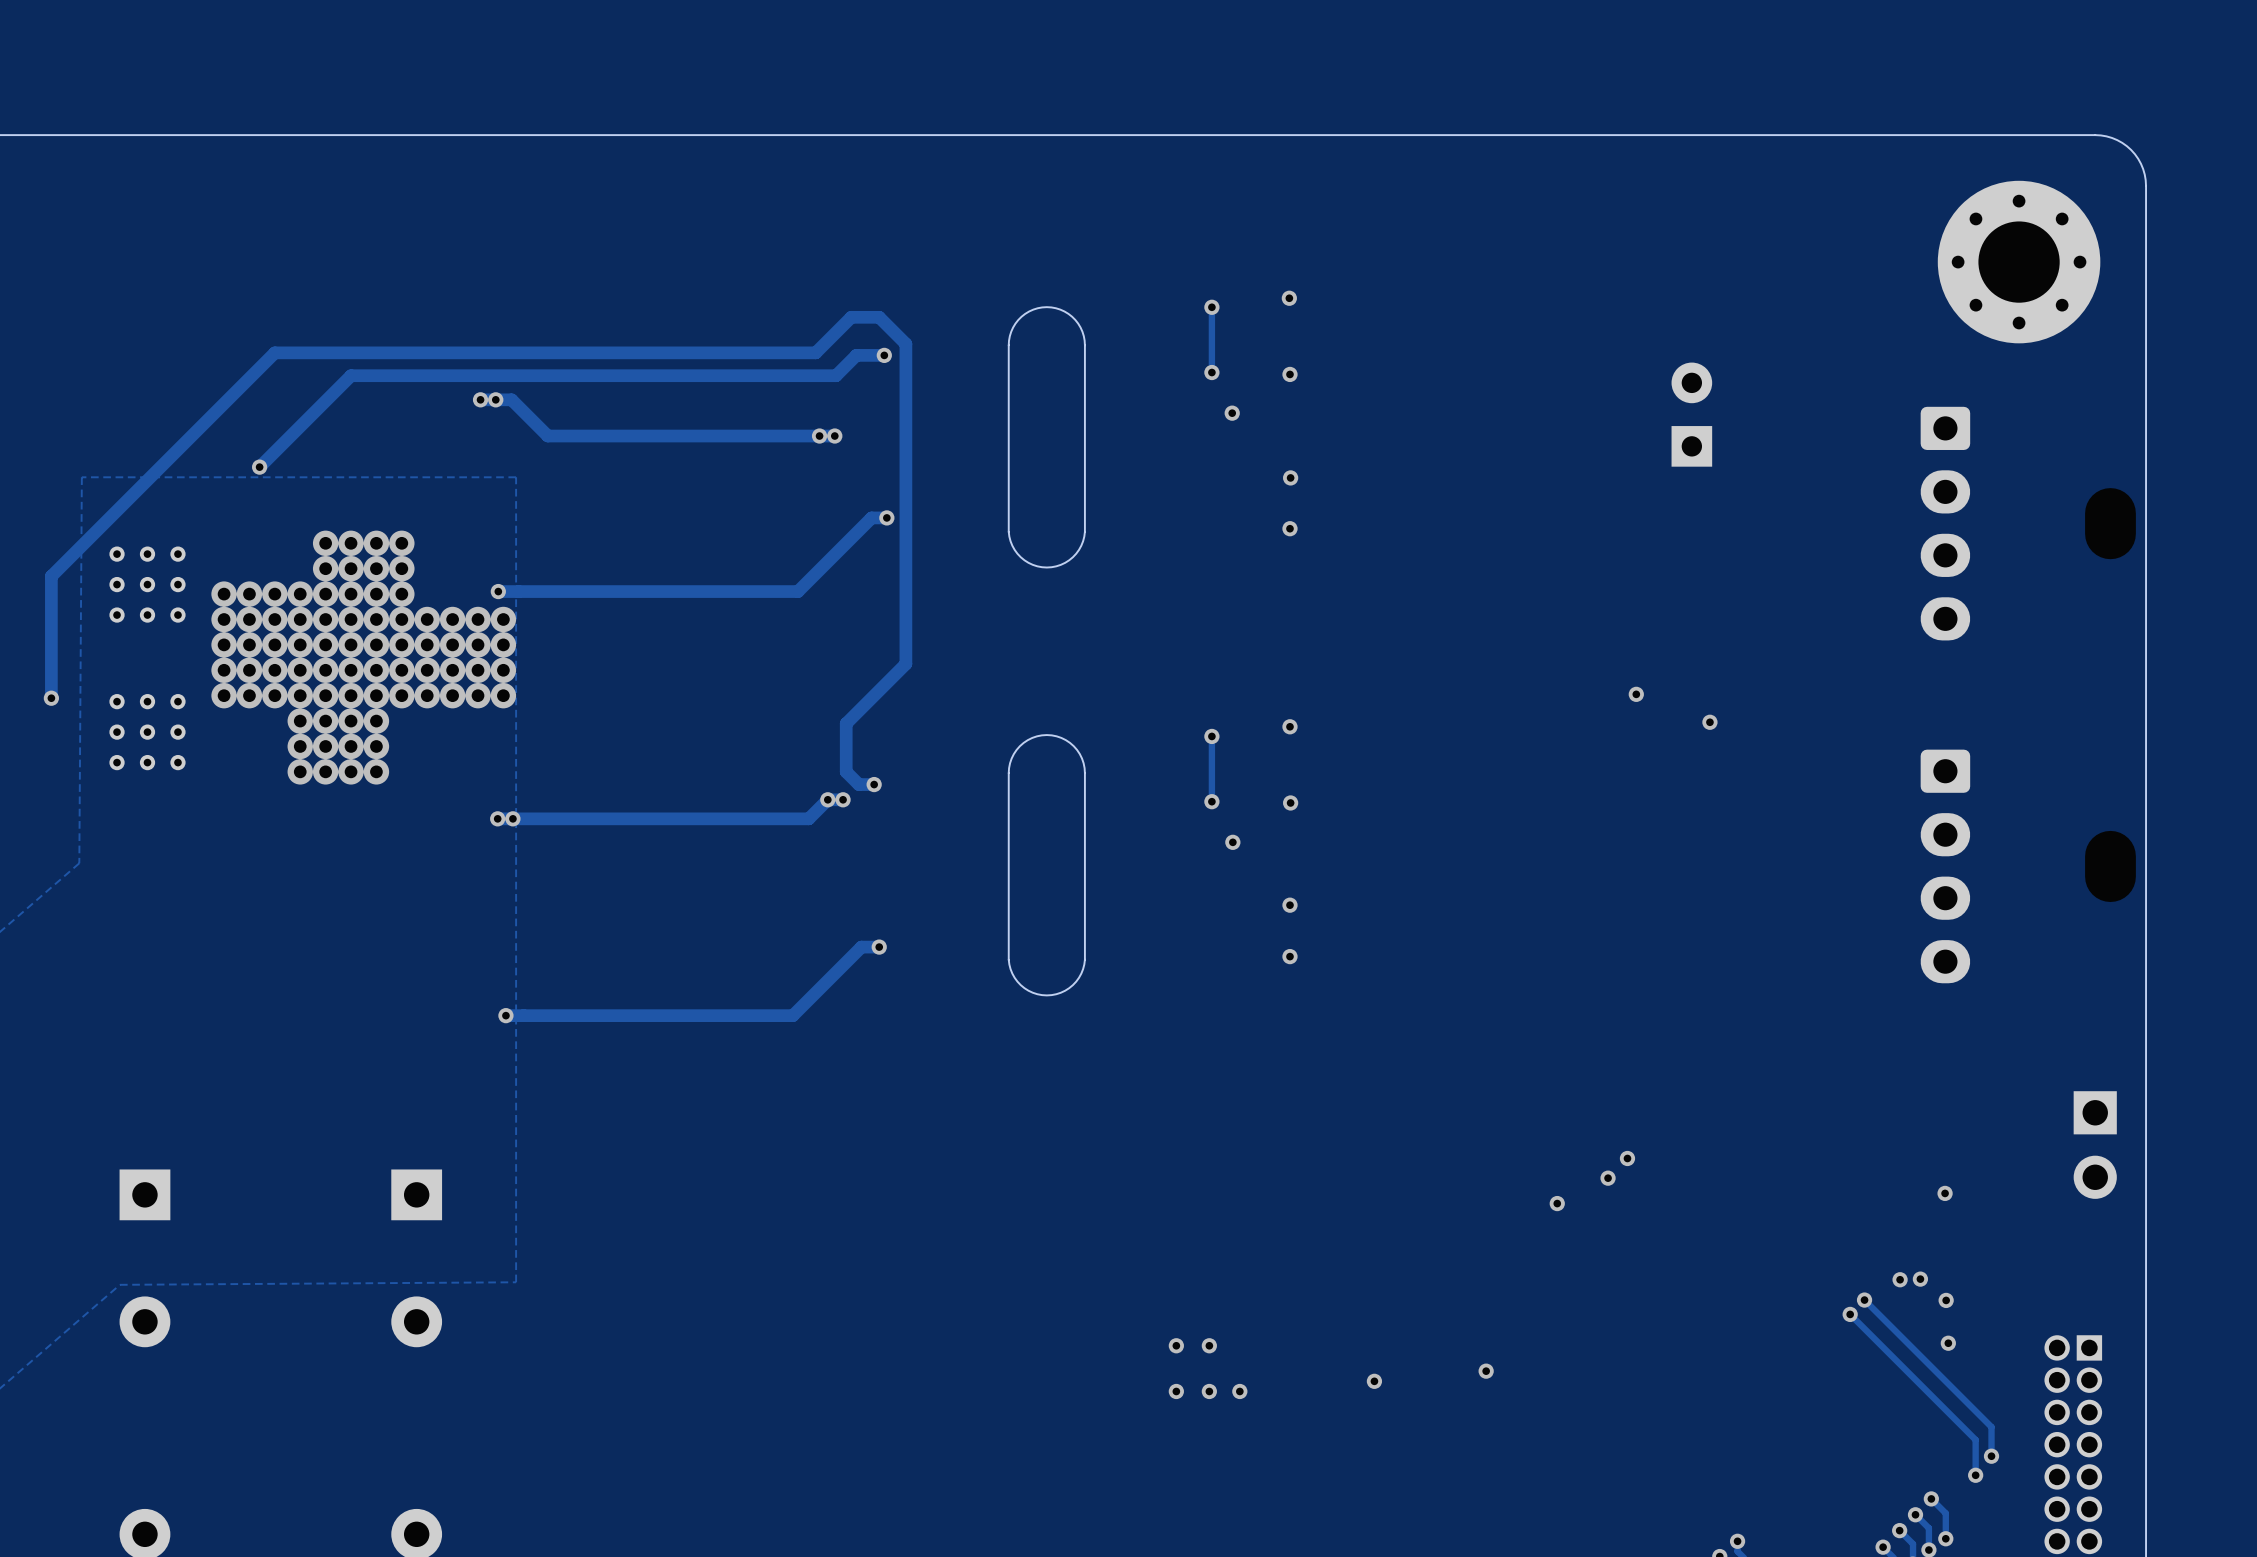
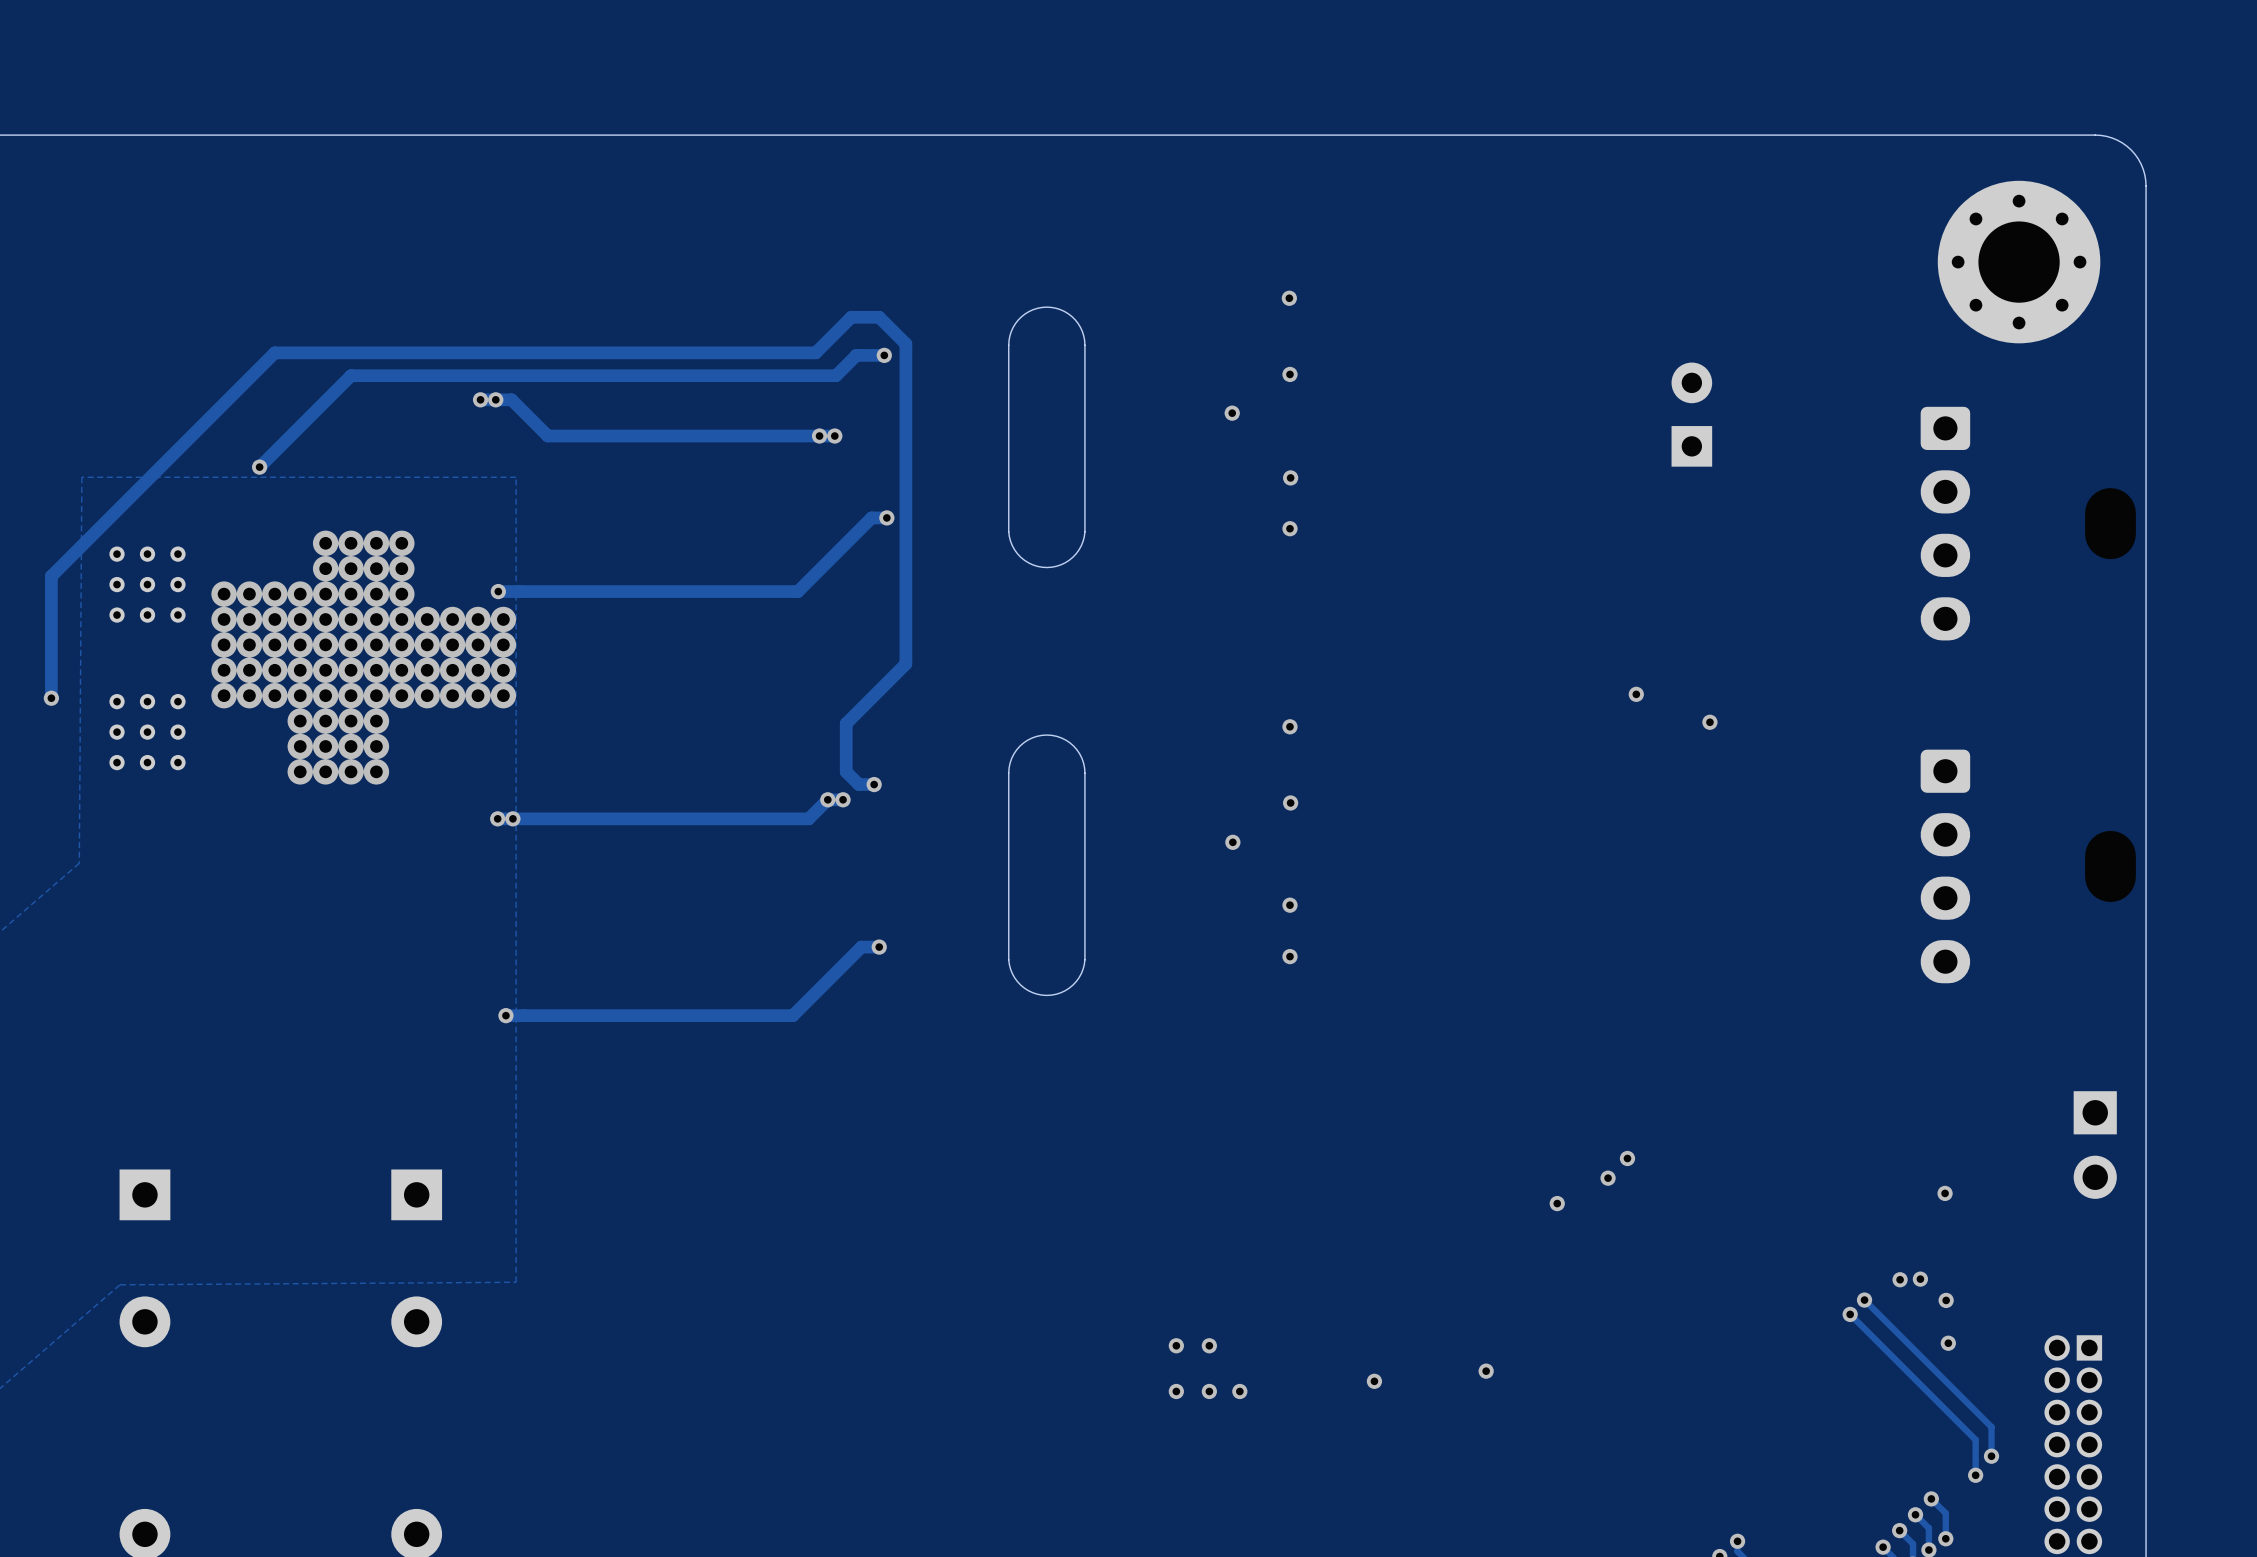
track: (1211, 307) (1211, 372) -> none
via: (1211, 307) -> none
via: (1211, 372) -> none
track: (1211, 736) (1211, 801) -> none
via: (1211, 736) -> none
via: (1211, 801) -> none

